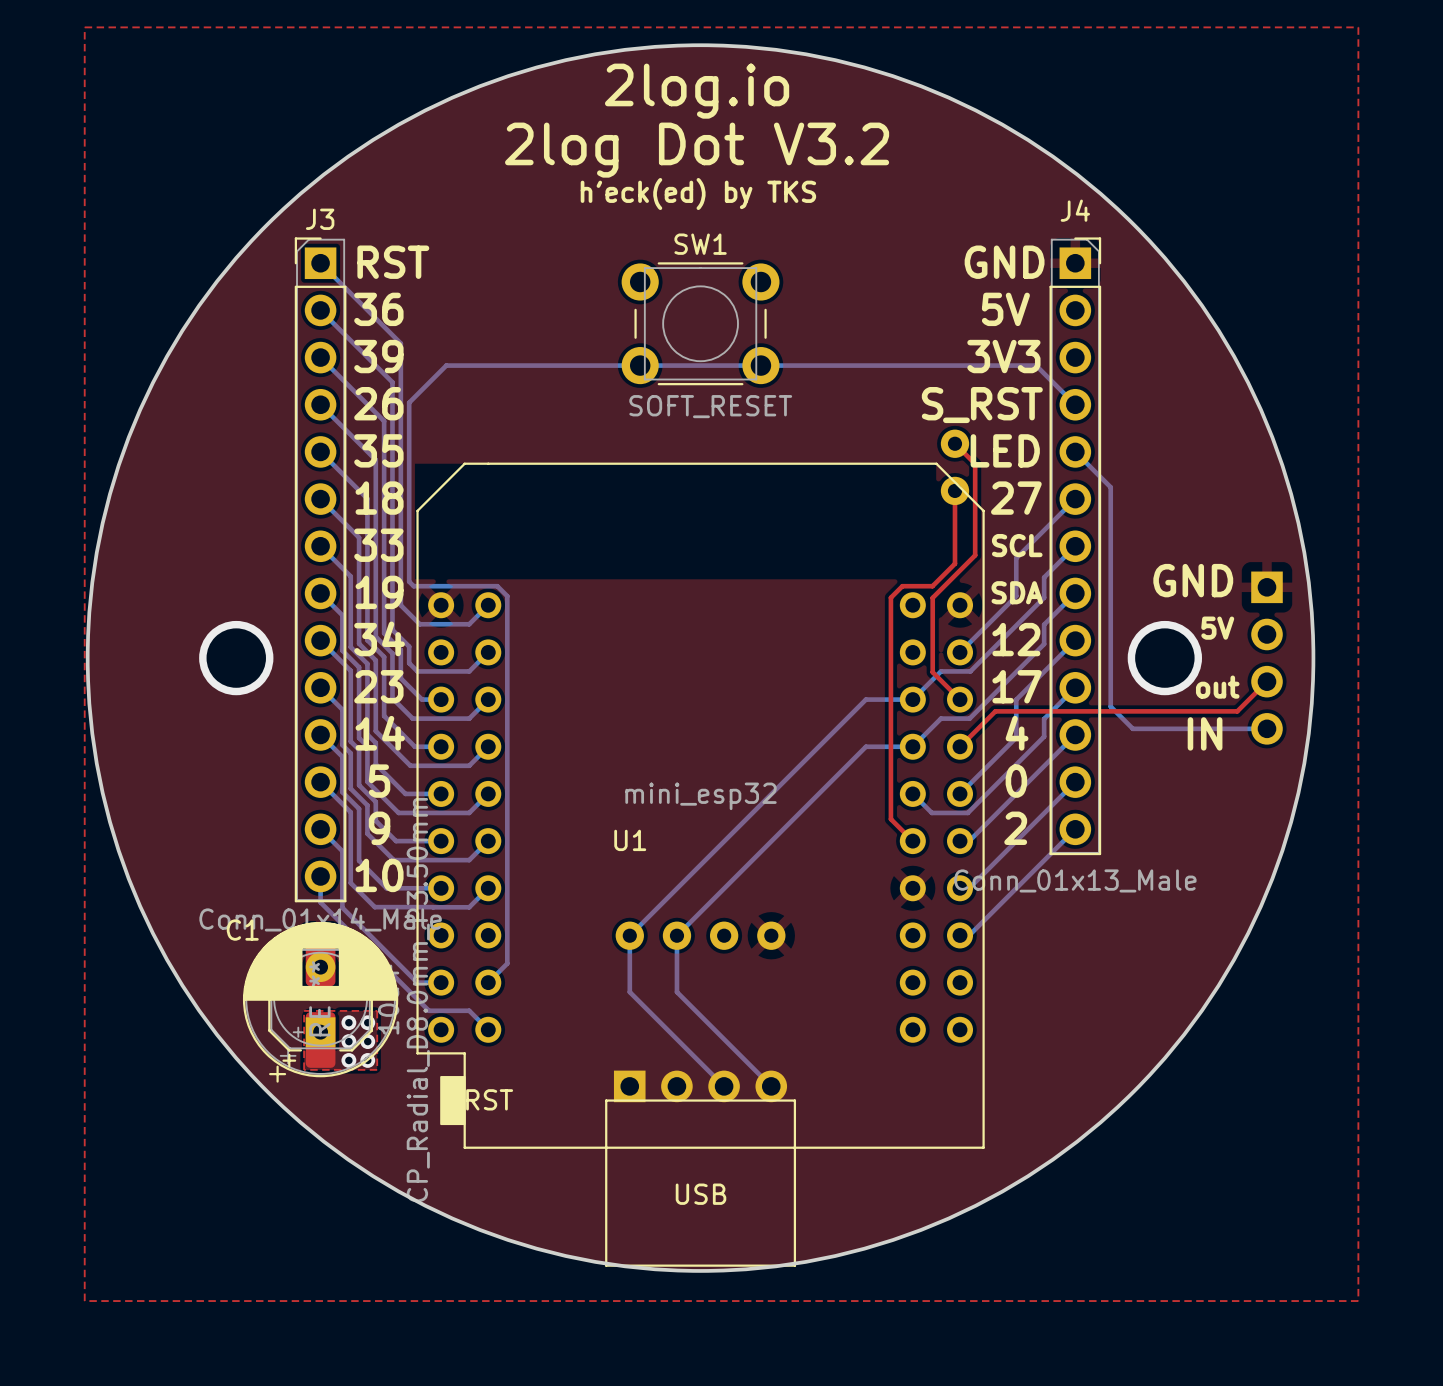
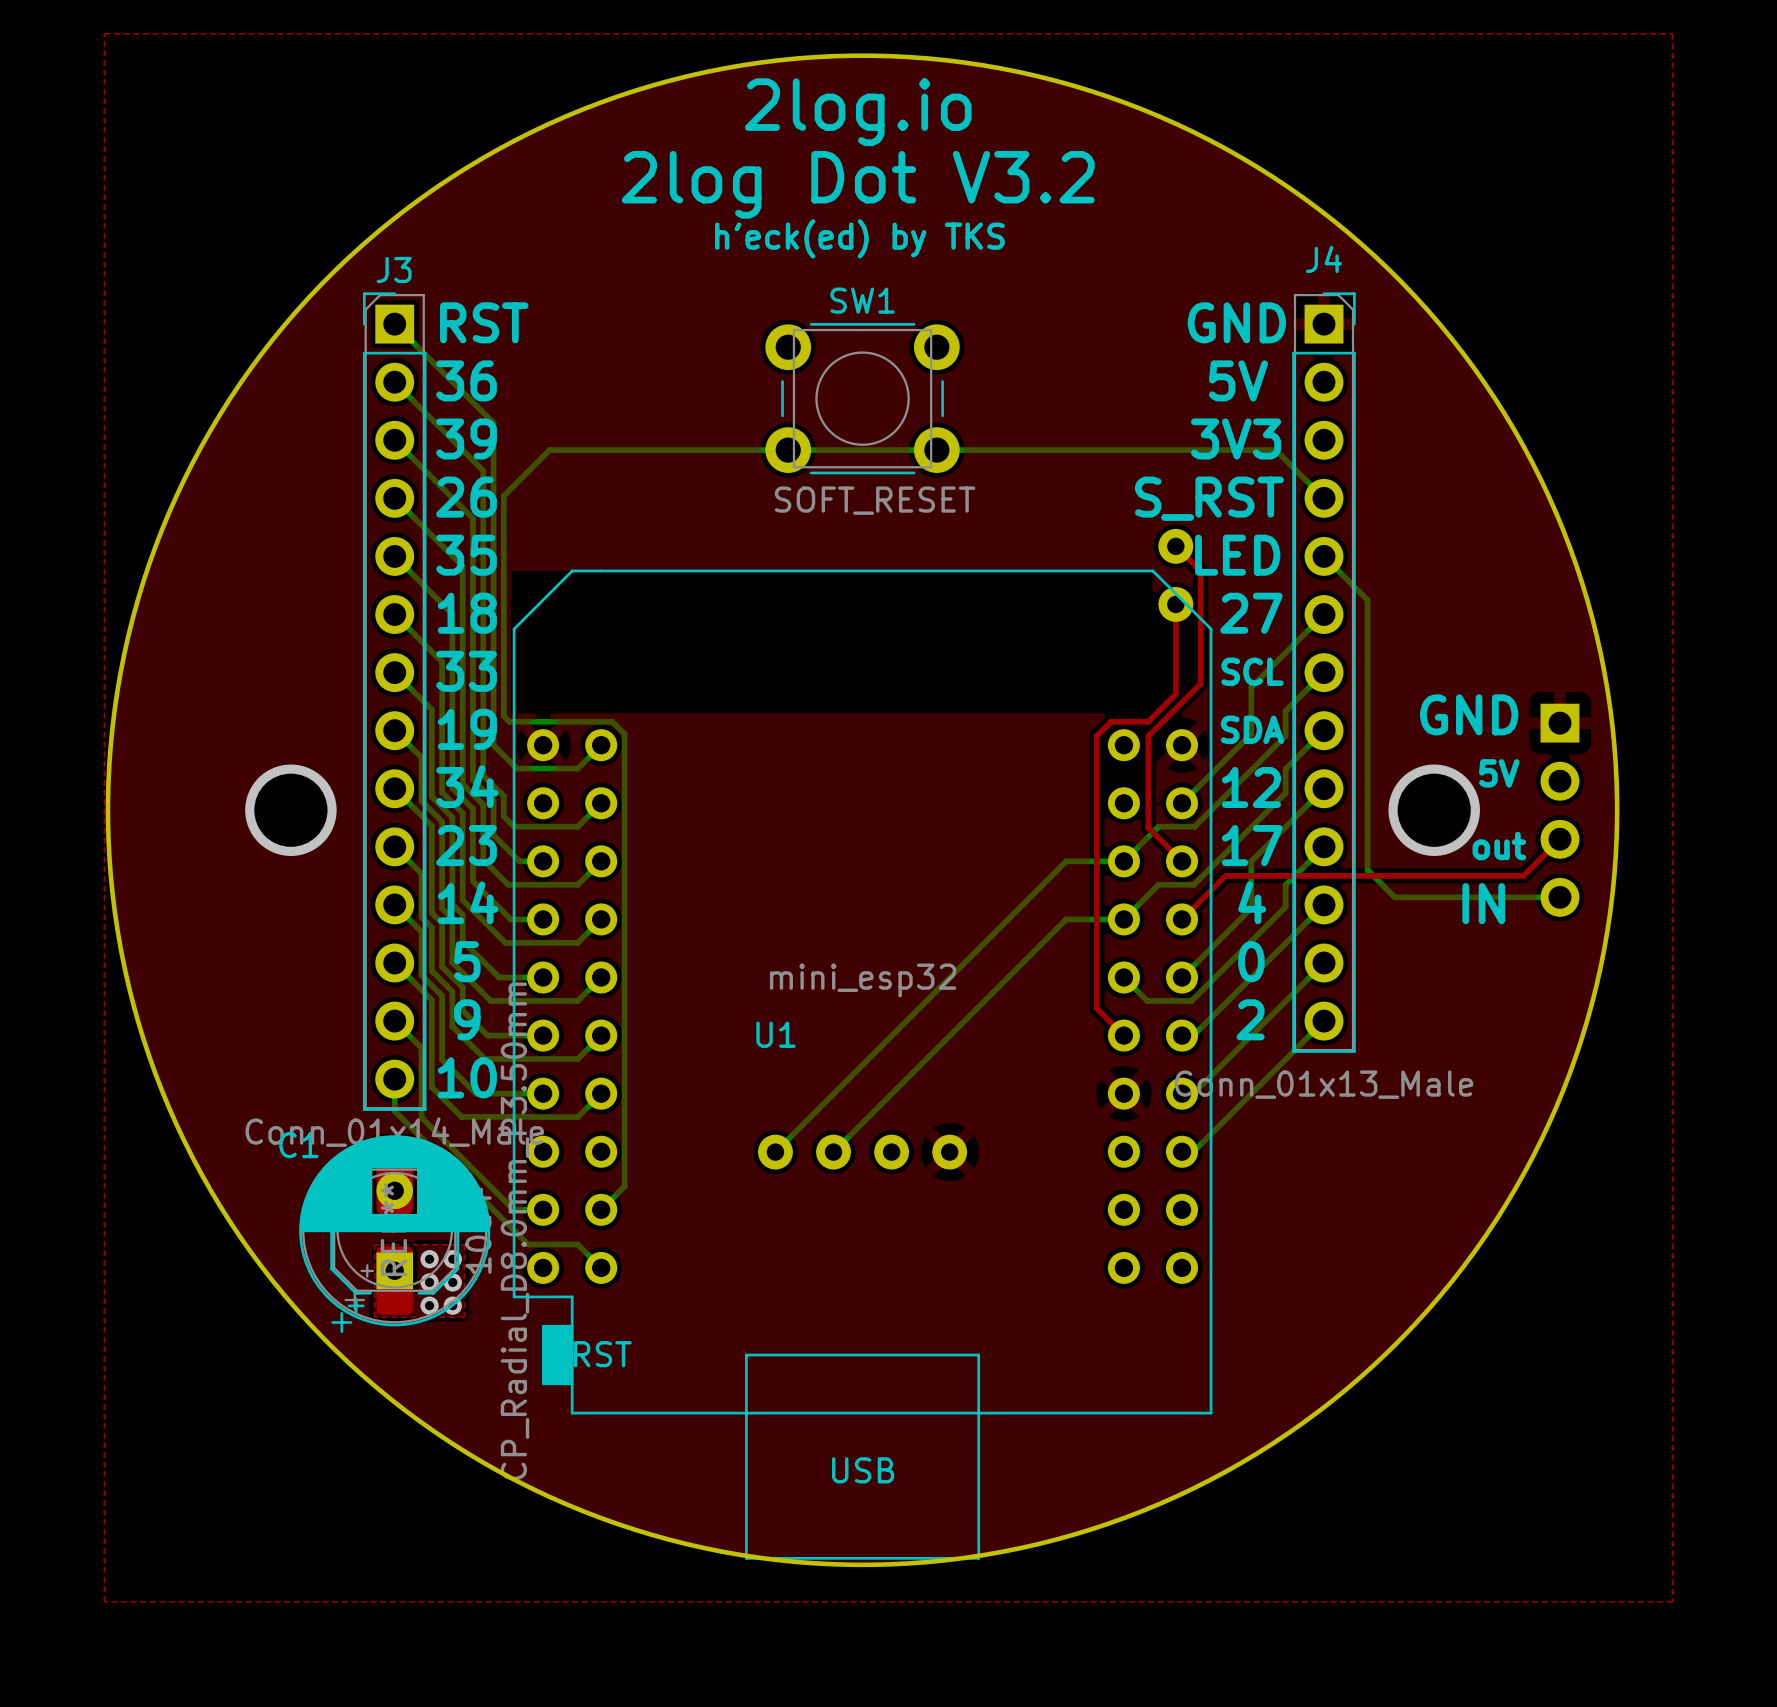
bottom track: (629, 935) (629, 992) (724, 1086) -> none
bottom track: (676, 935) (676, 992) (771, 1086) -> none
part: (700, 1086) -> none

